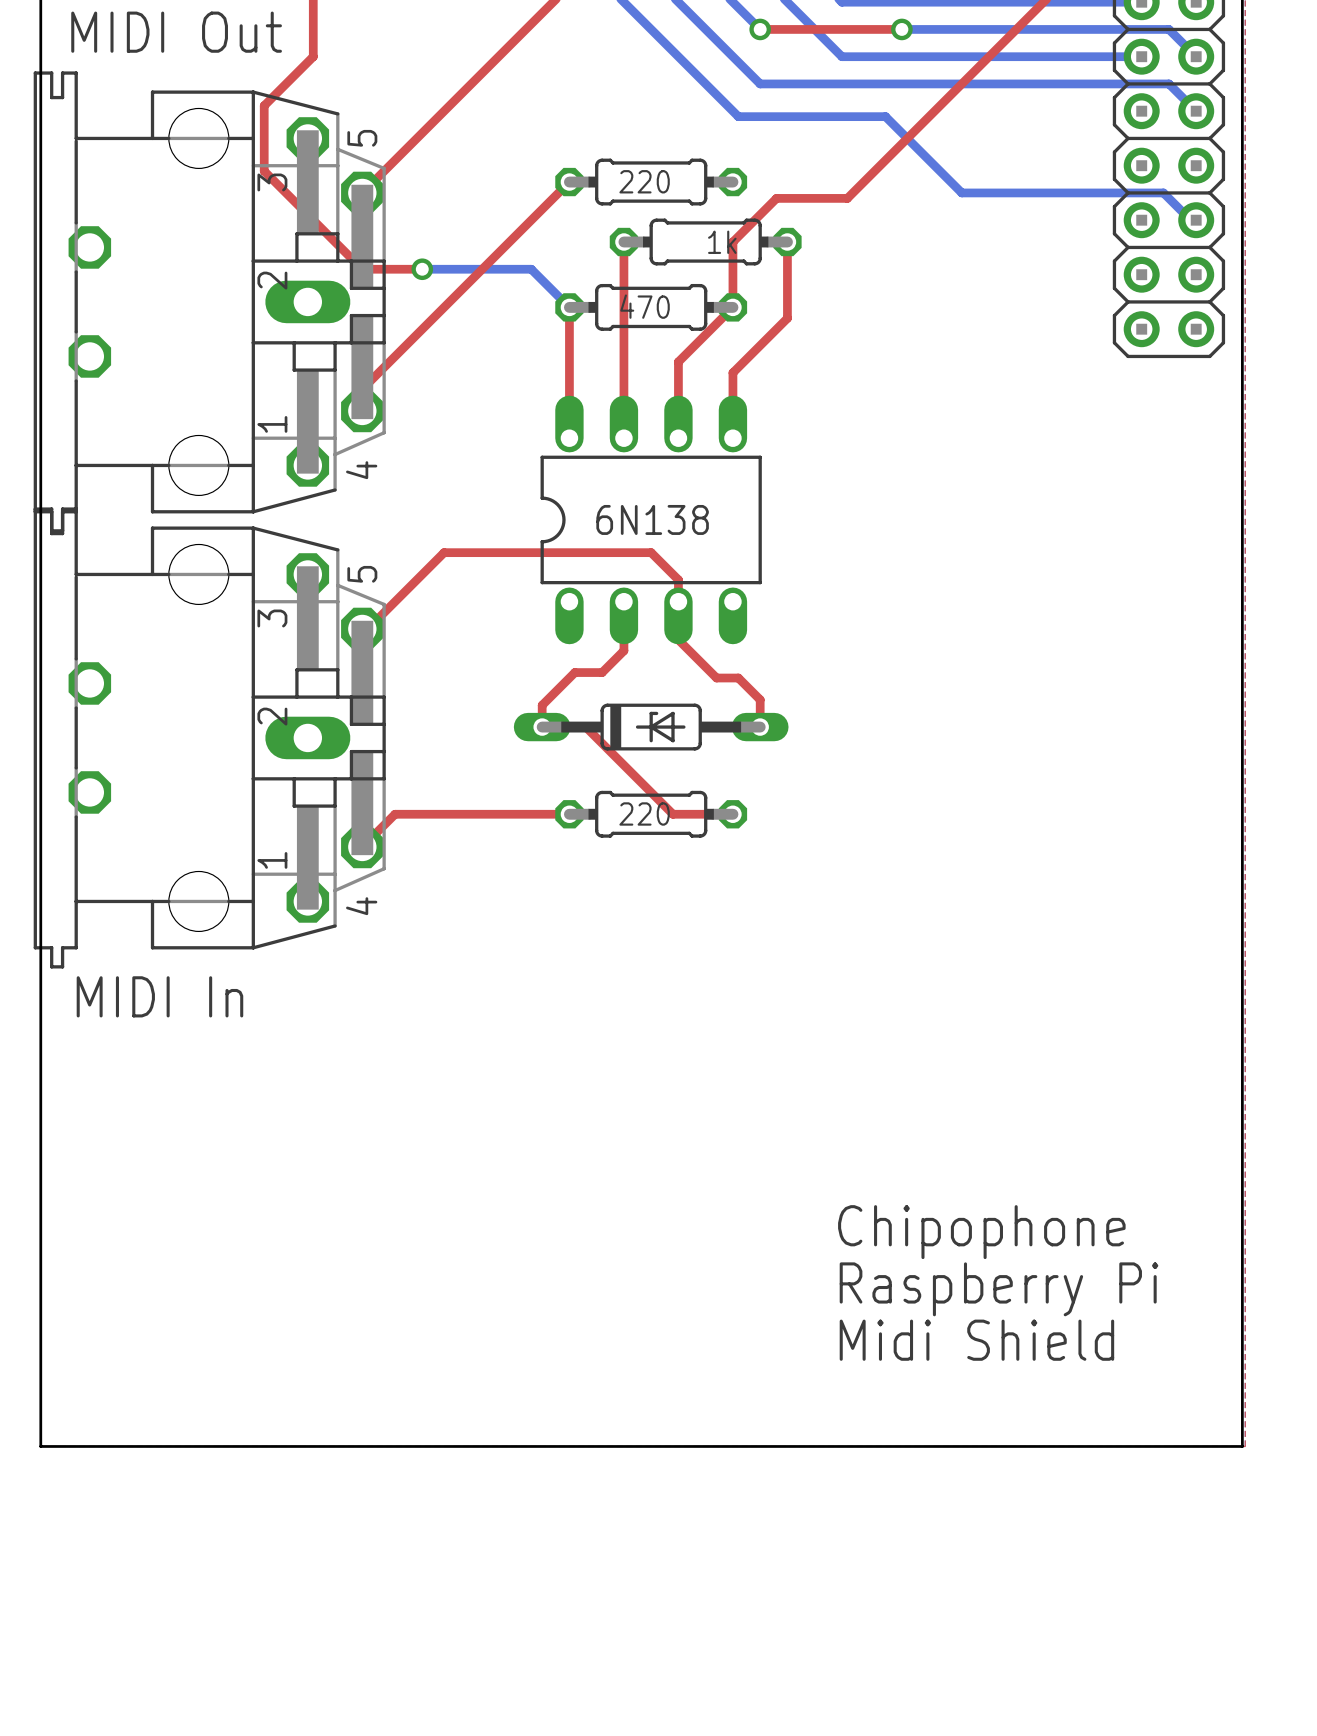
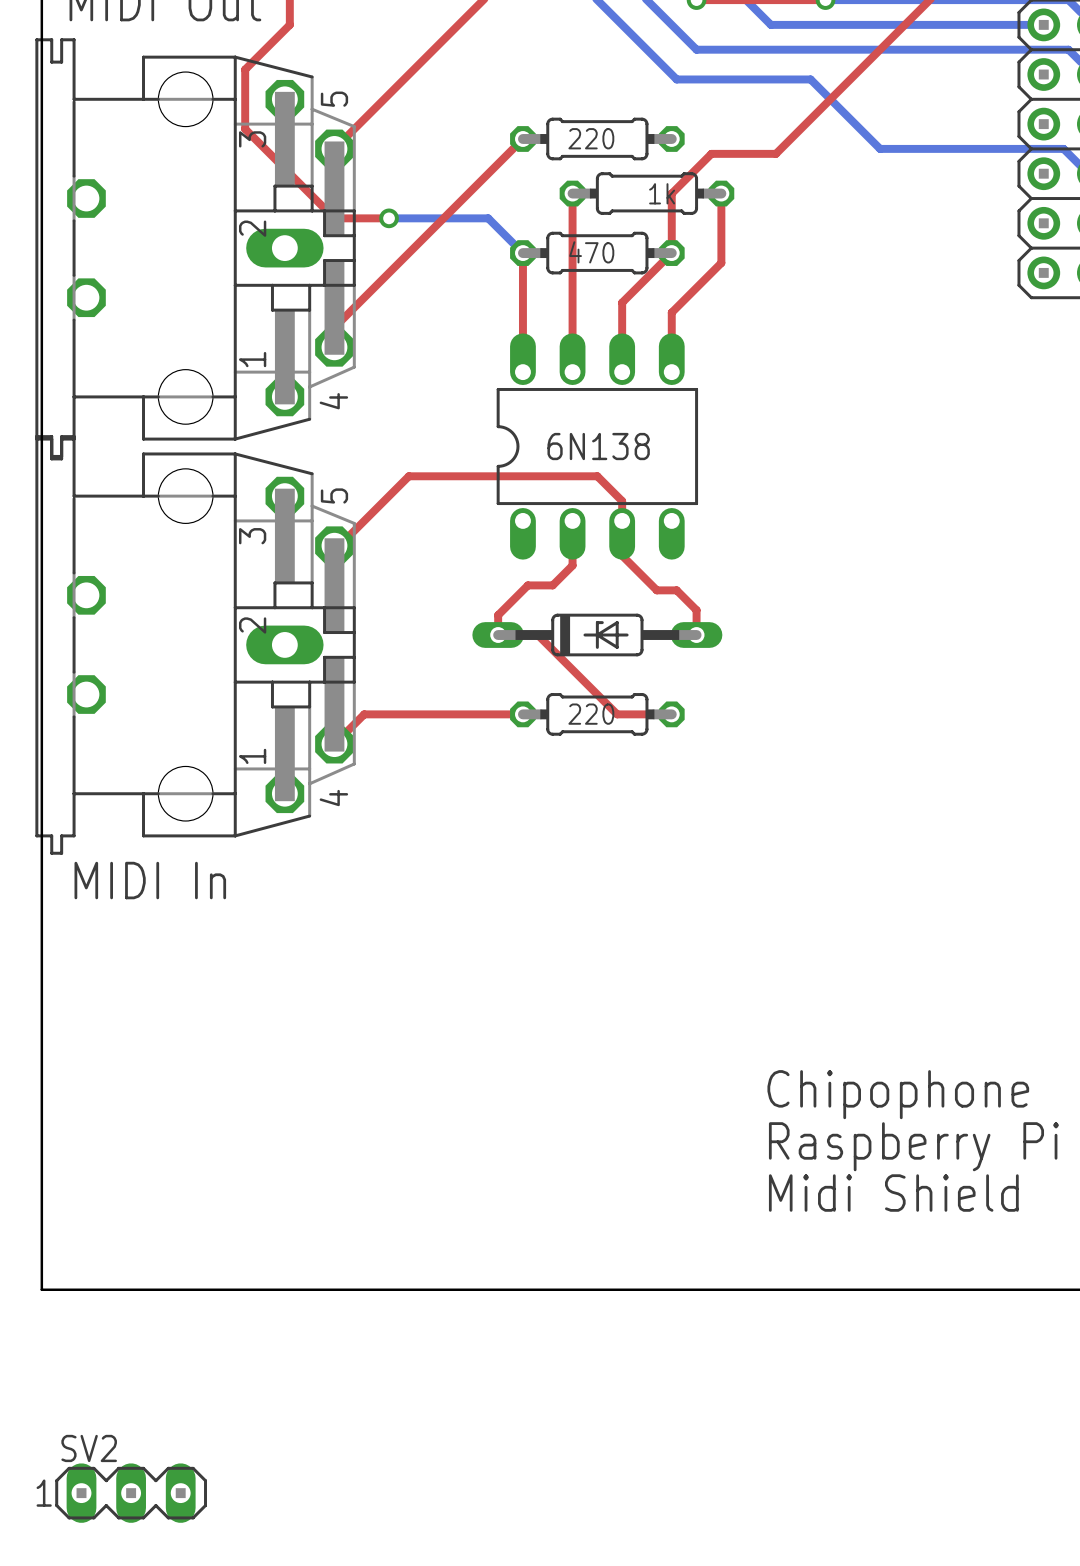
SV2: none -> (131, 1493)

